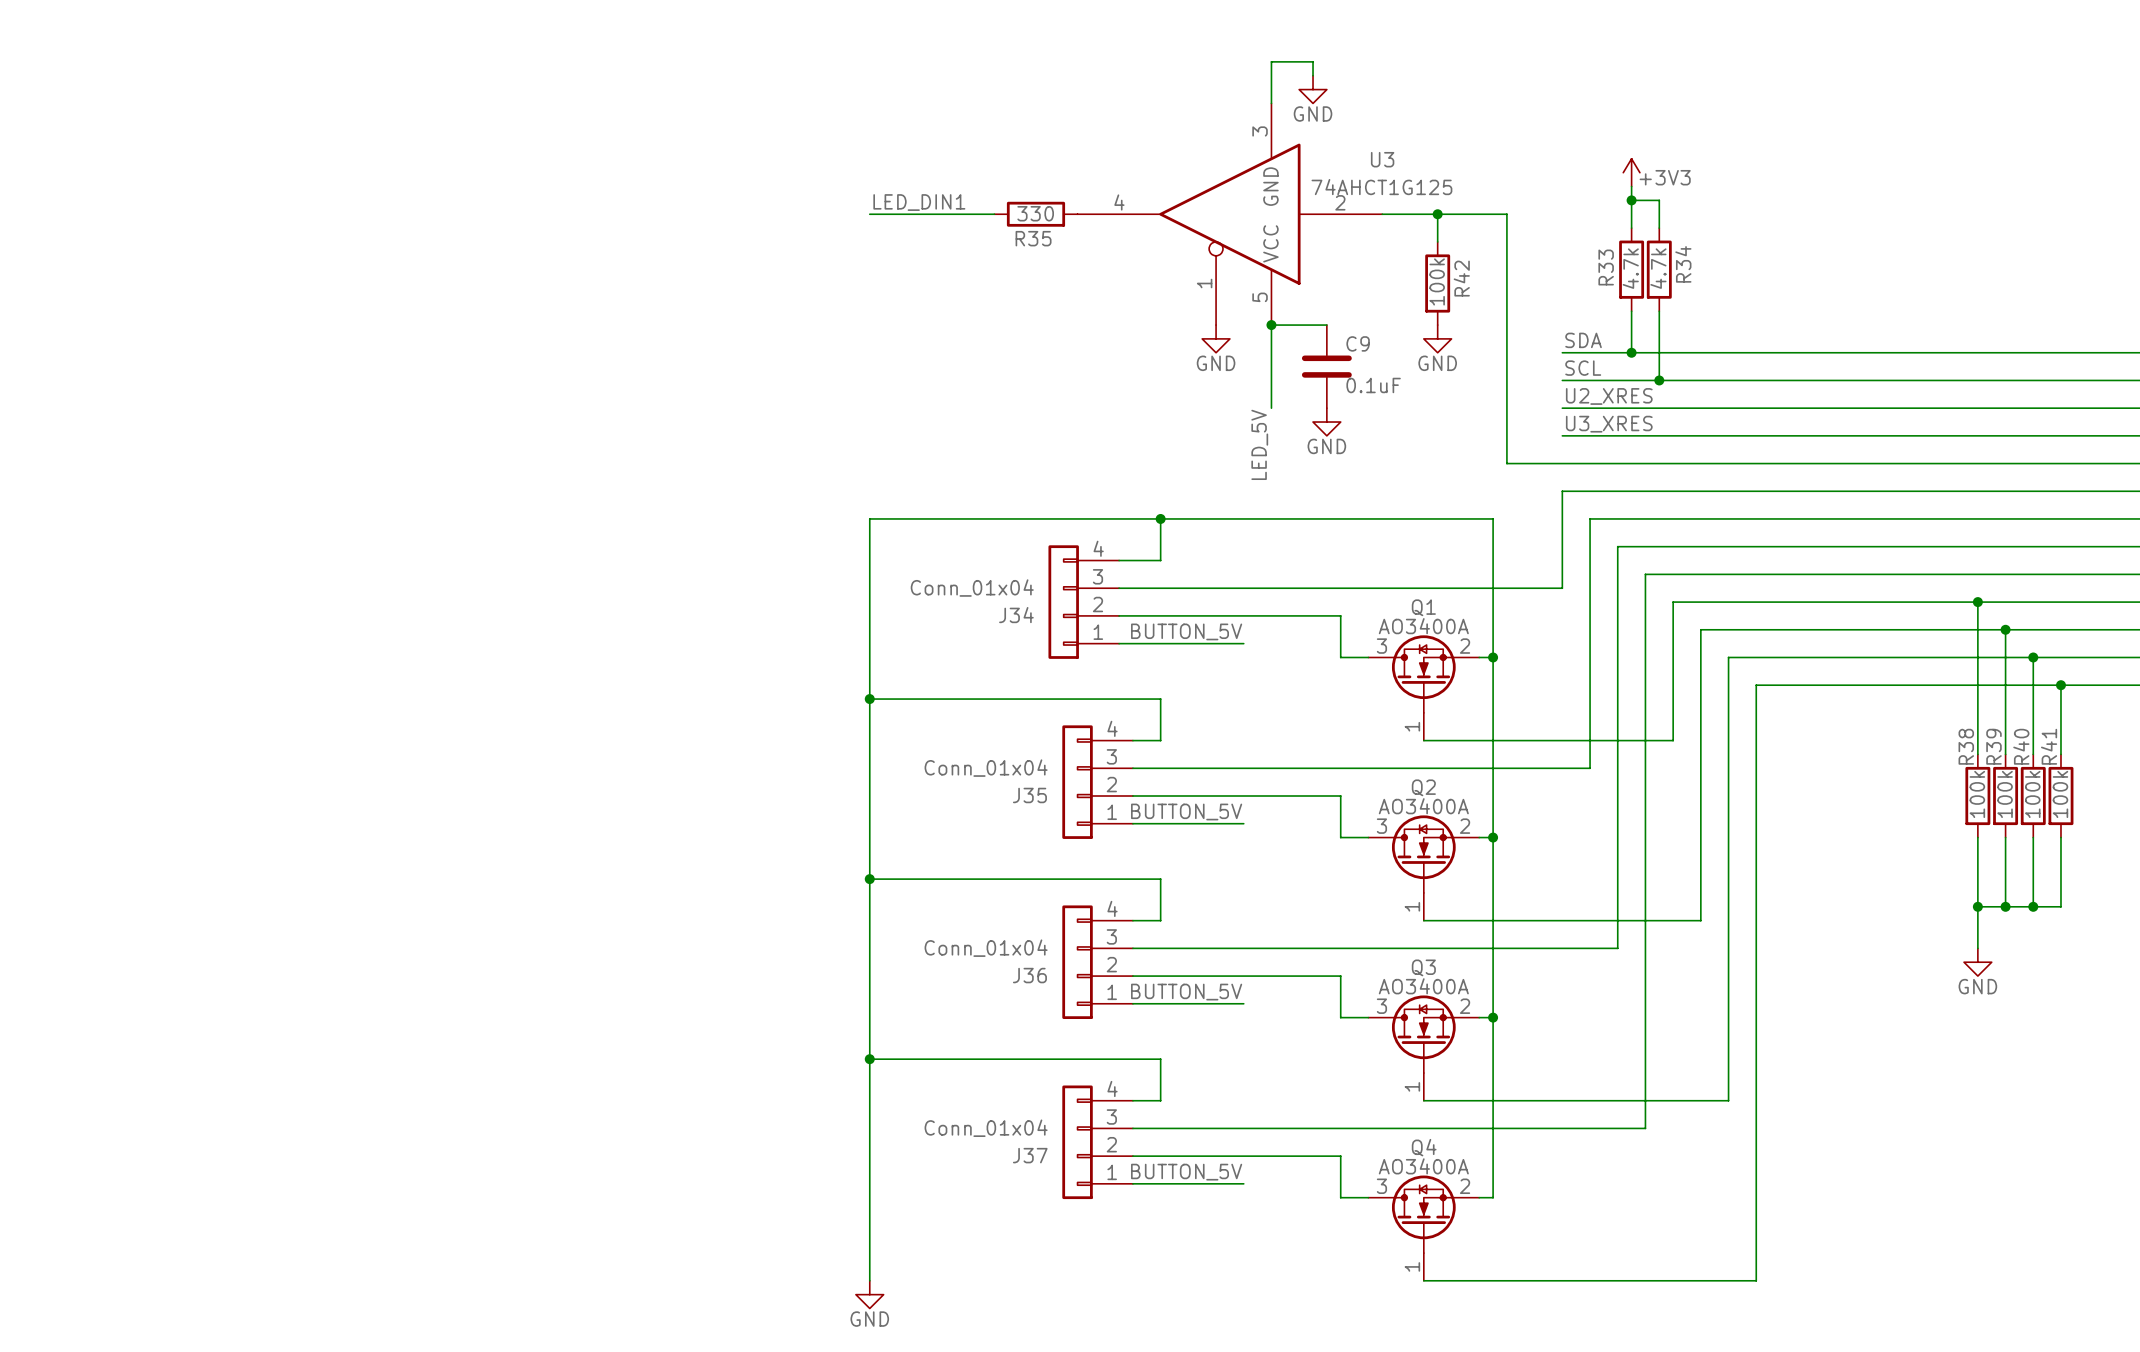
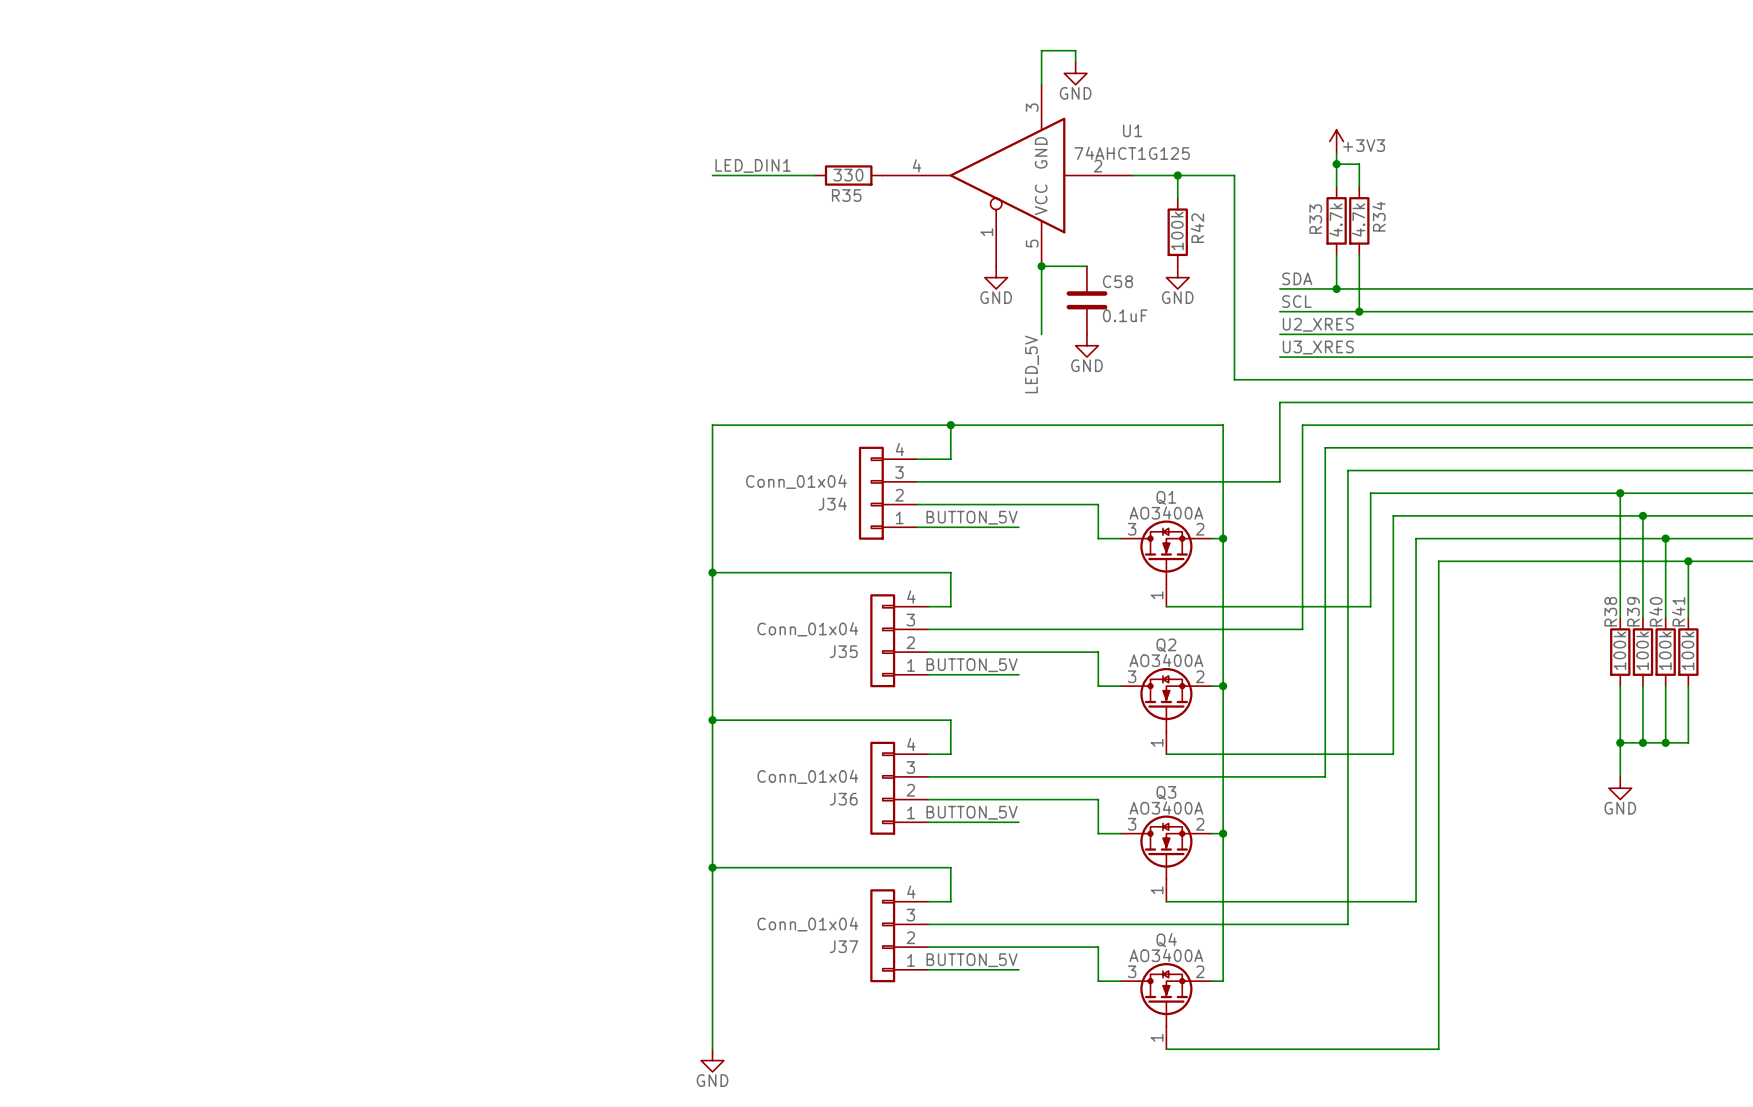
U3 name: U3 (1382, 159) -> U1 (1132, 130)
C9 name: C9 (1358, 343) -> C58 (1117, 281)

